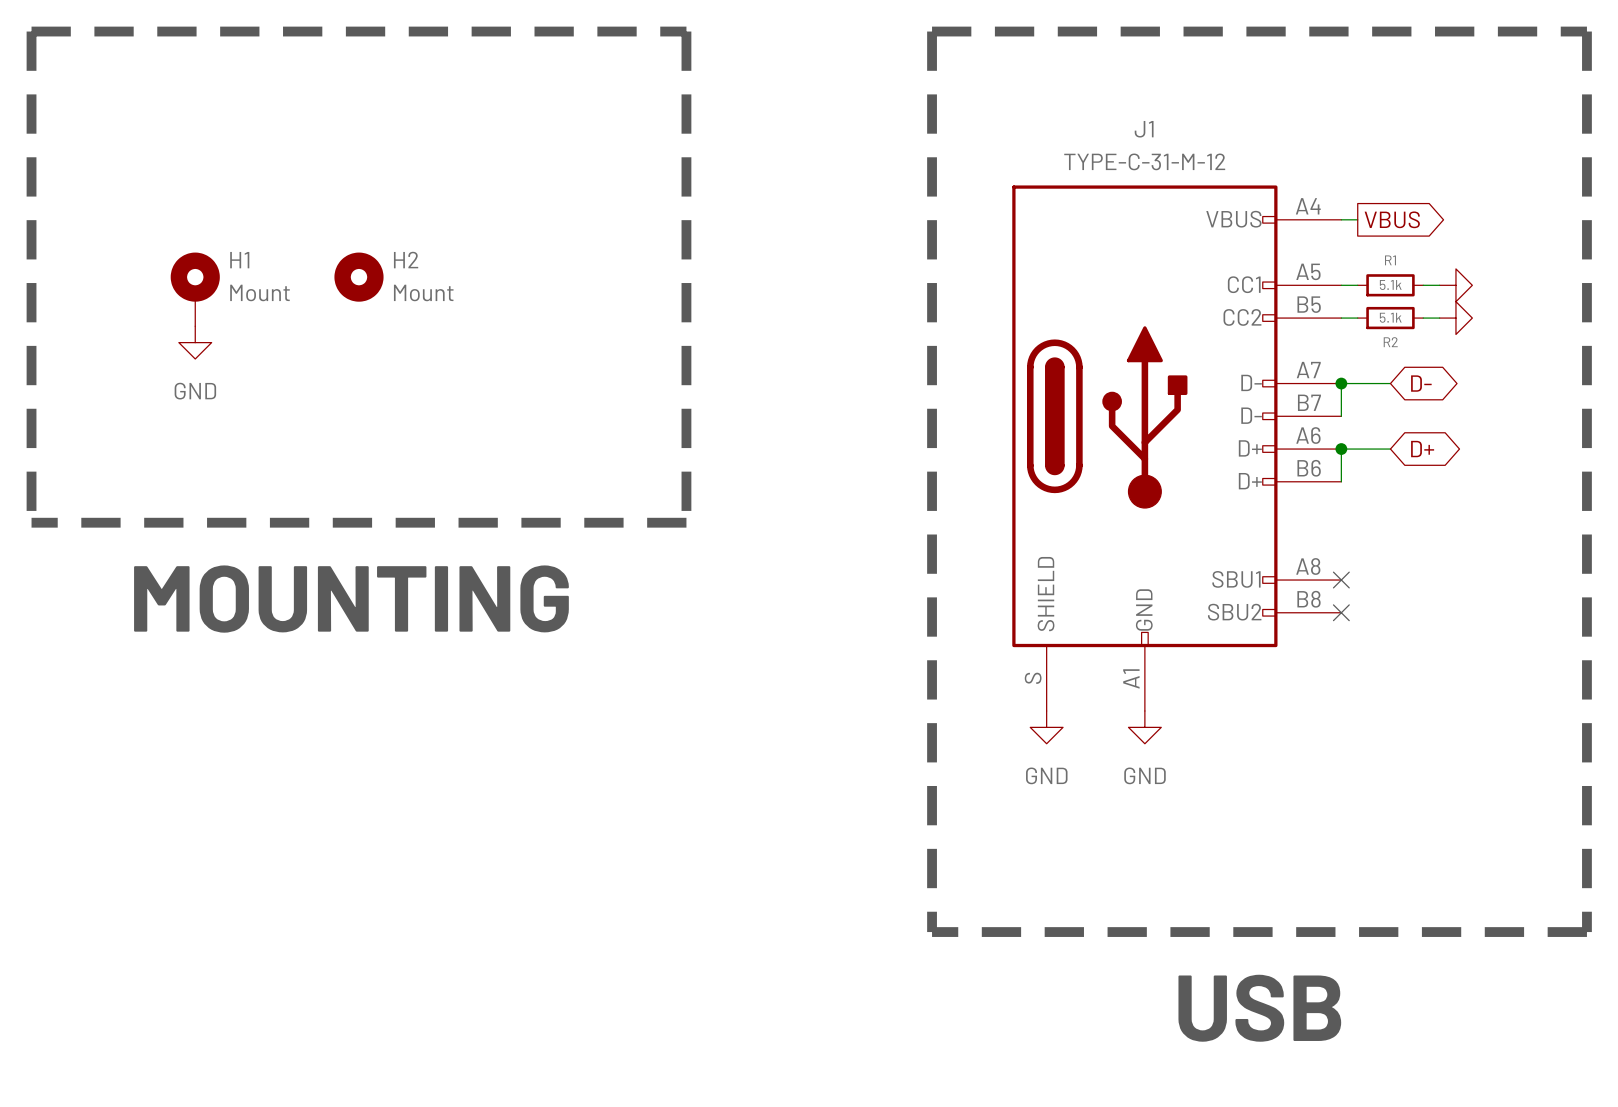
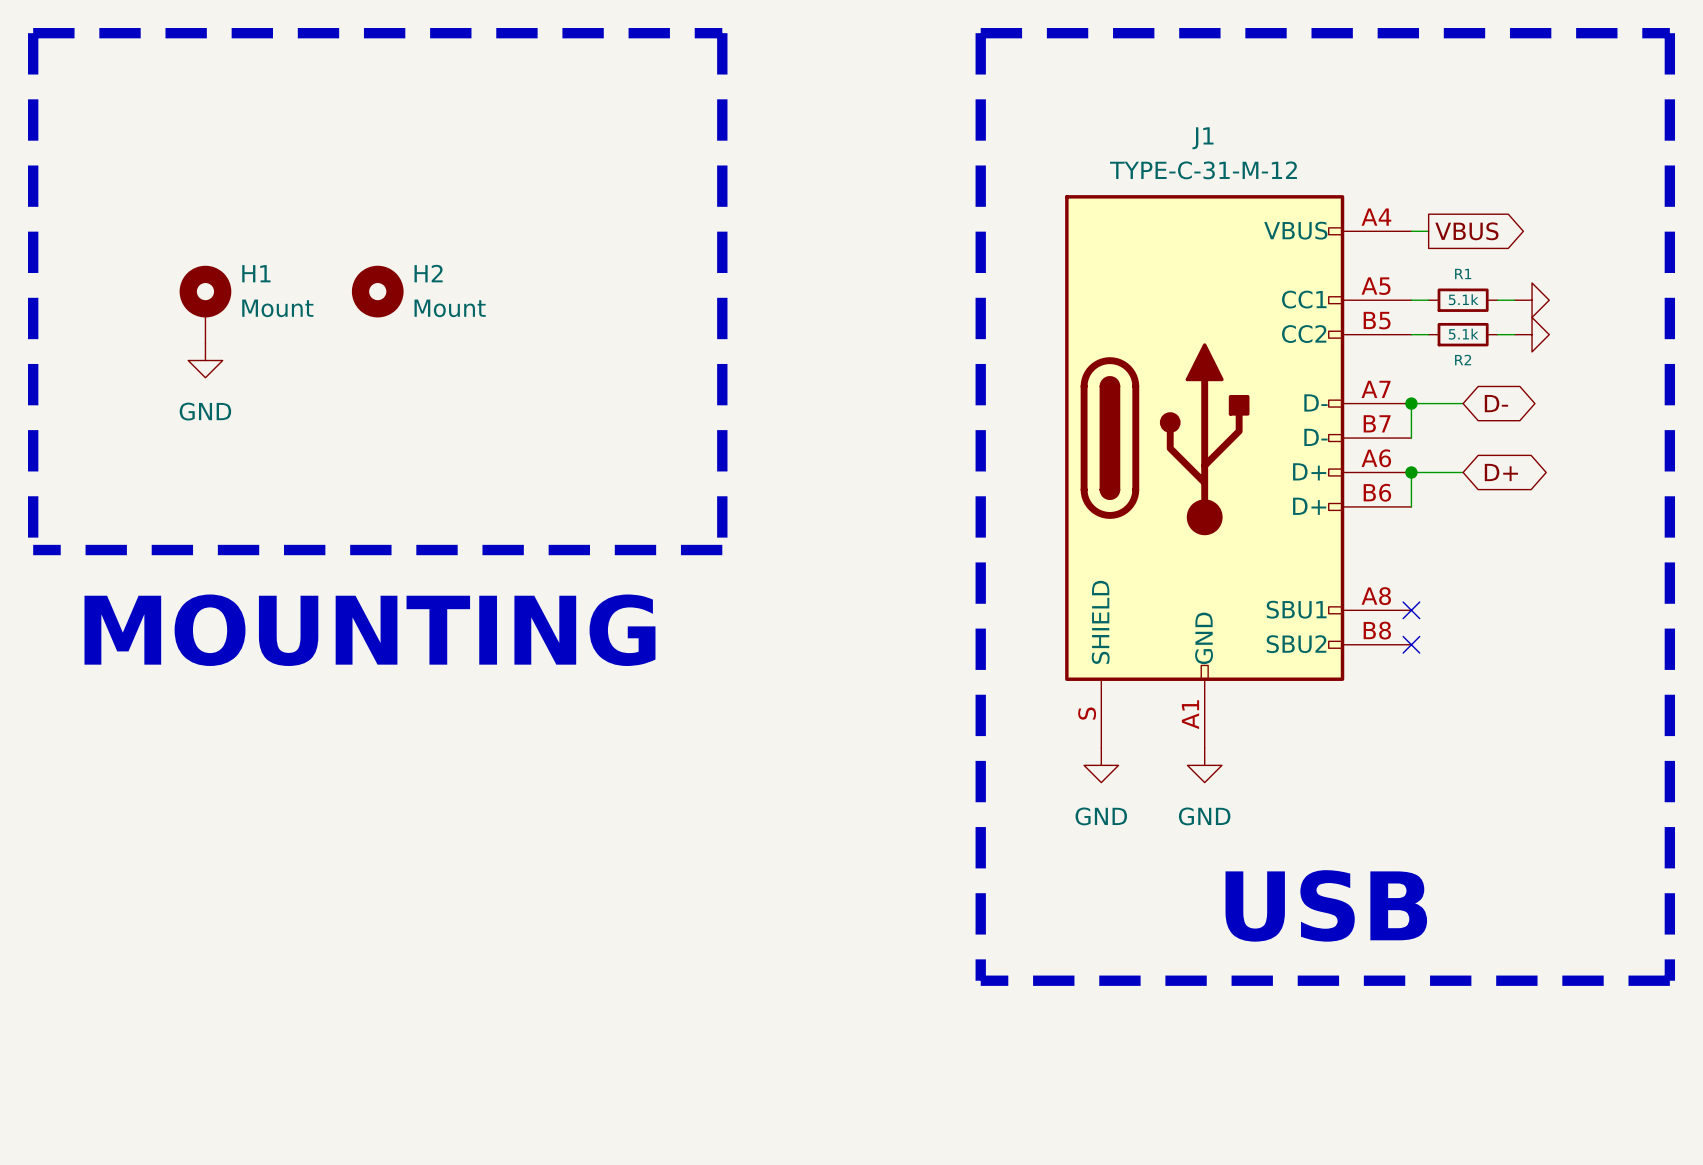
text position: USB (1259, 1008) -> USB (1326, 905)

